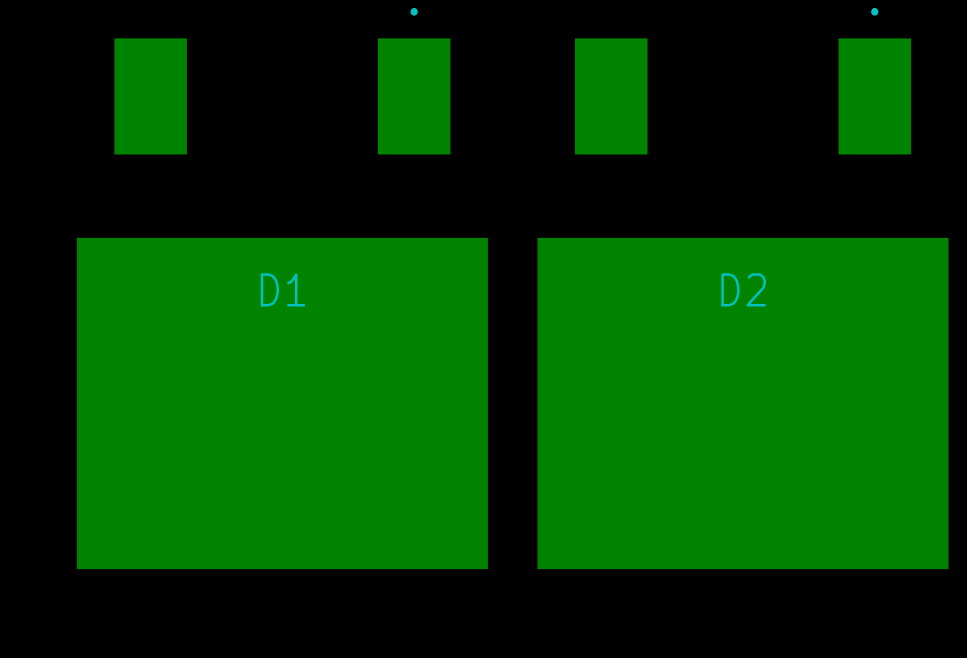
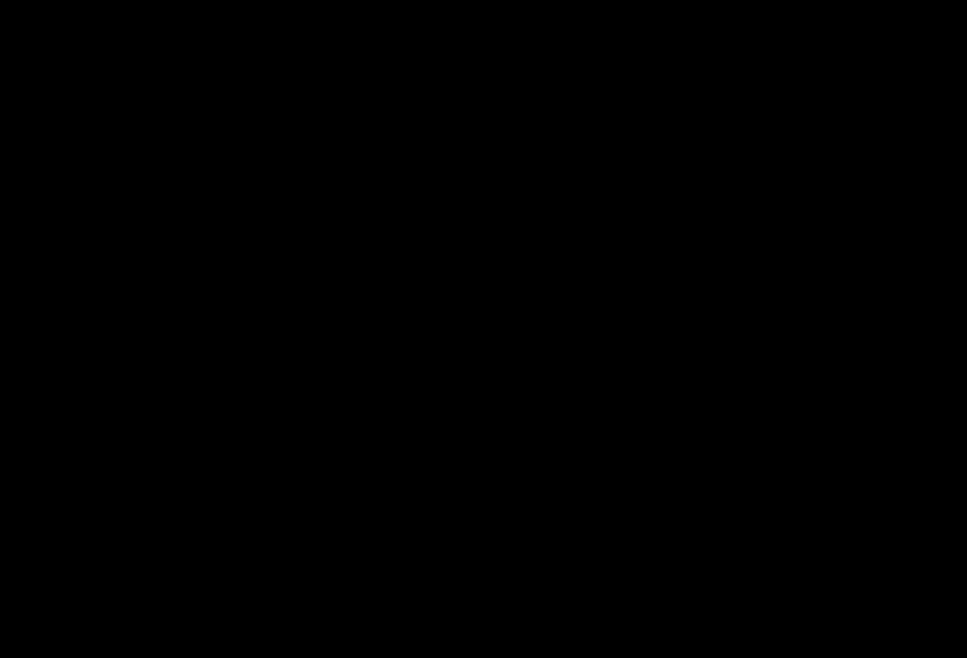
D1: (282, 288) -> none
D2: (743, 288) -> none

